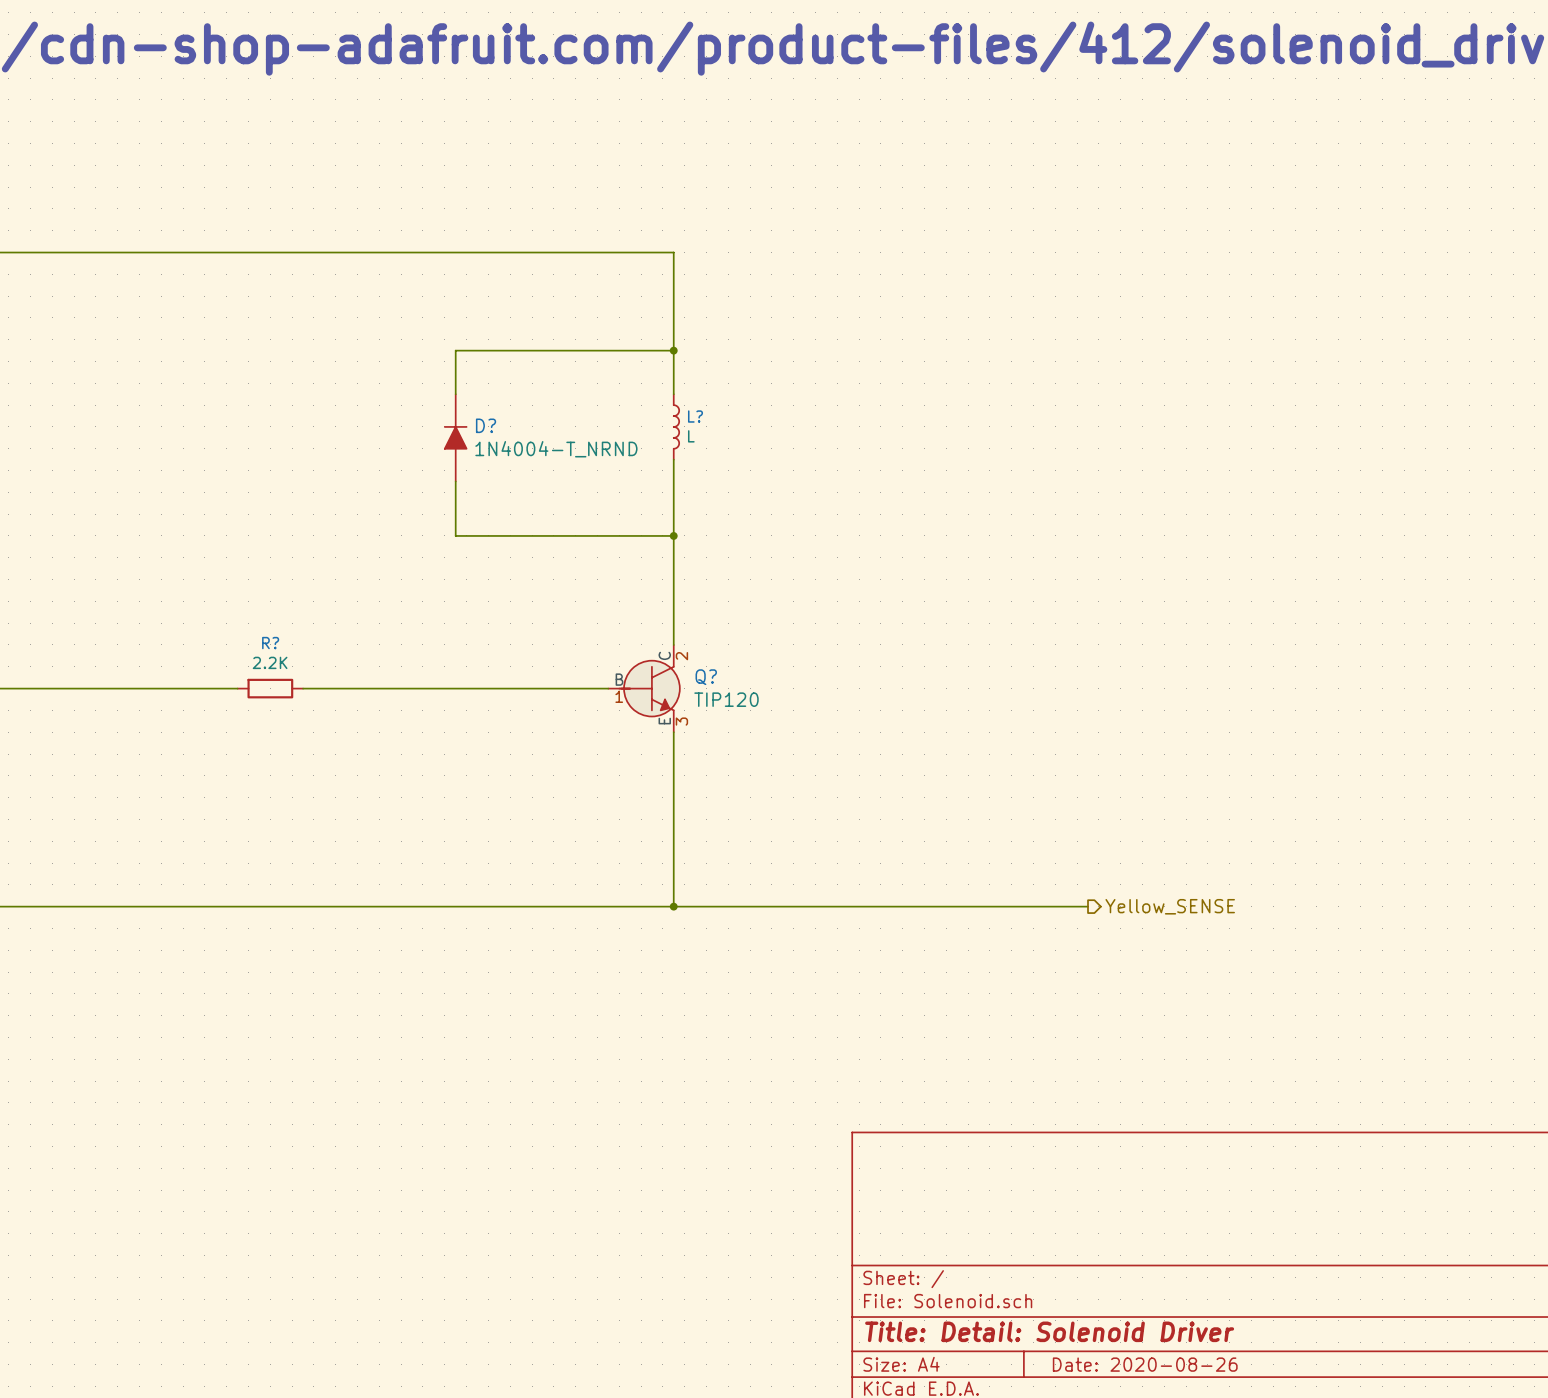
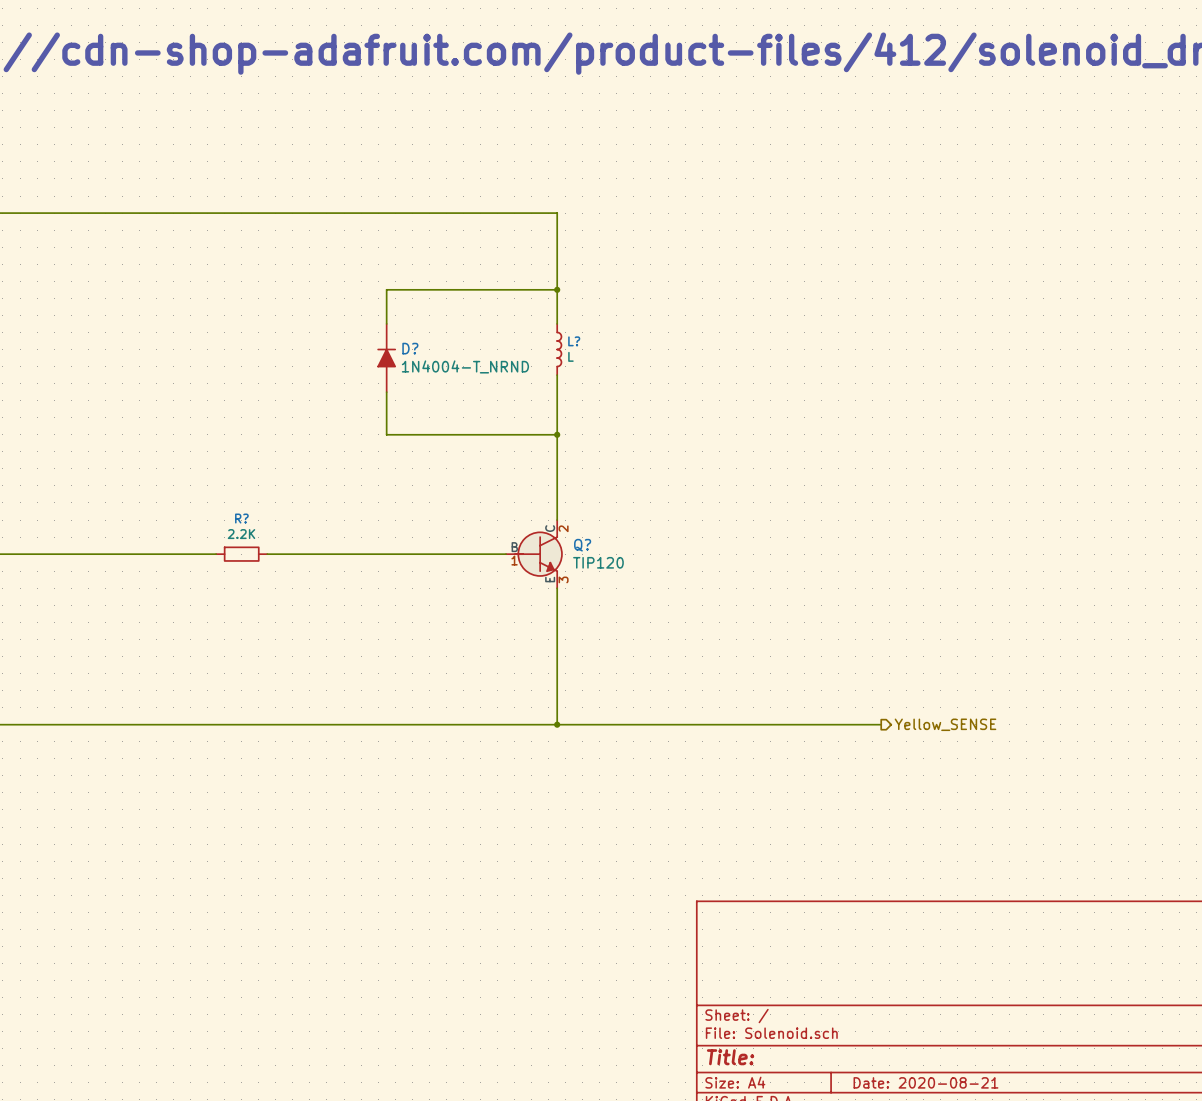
title block: Title: Detail: Solenoid Driver (1049, 1331) -> Title: (730, 1057)
title block: Date: 2020-08-26 (1145, 1364) -> Date: 2020-08-21 (925, 1082)

